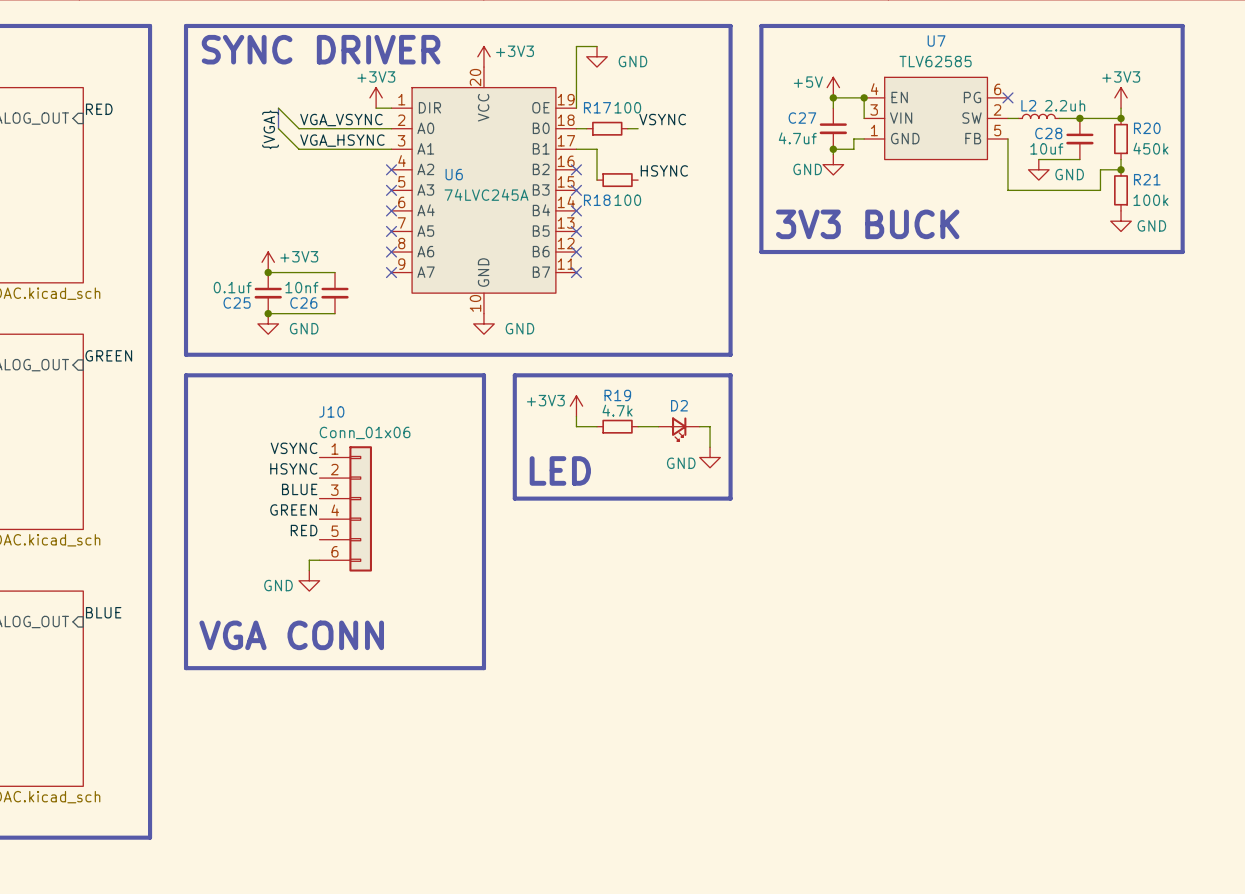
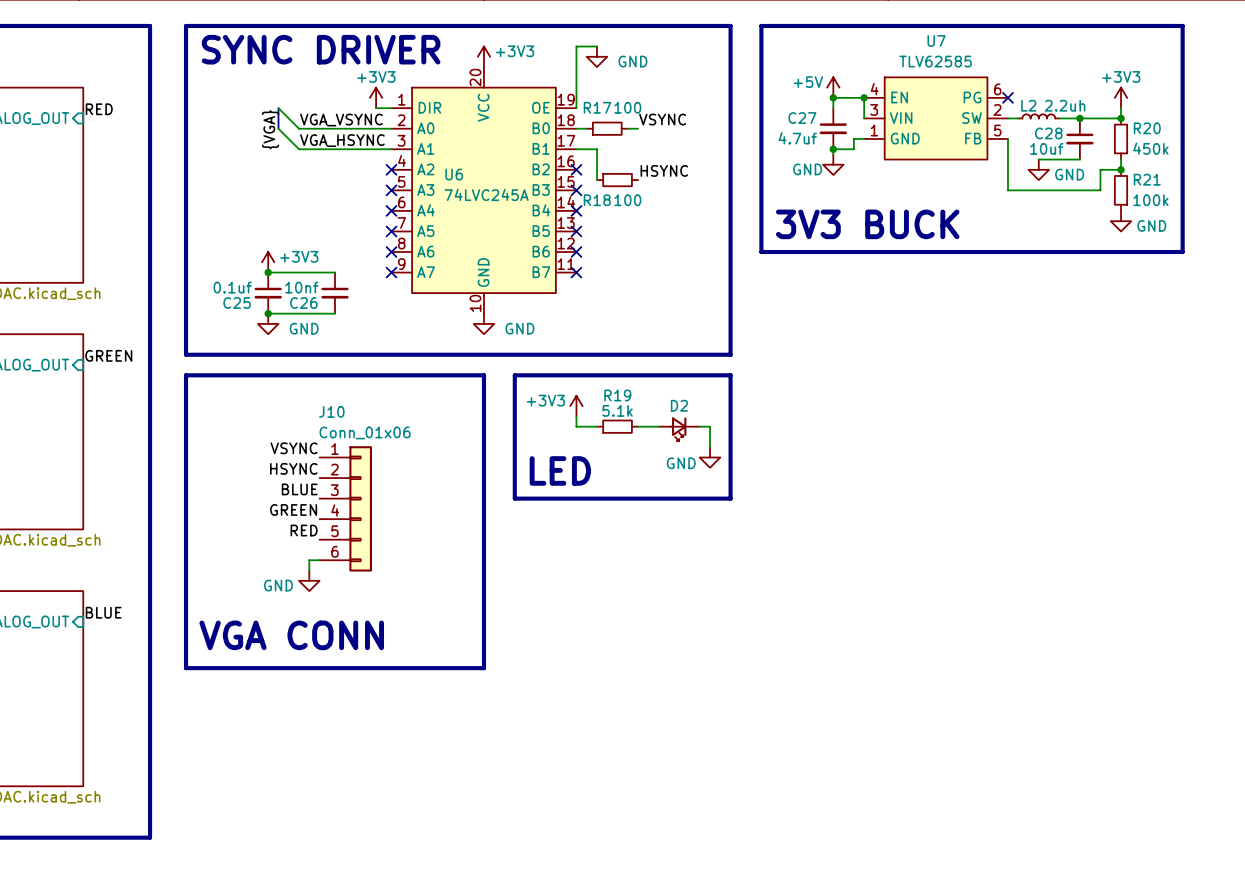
R19 value: 4.7k (617, 410) -> 5.1k (617, 410)

